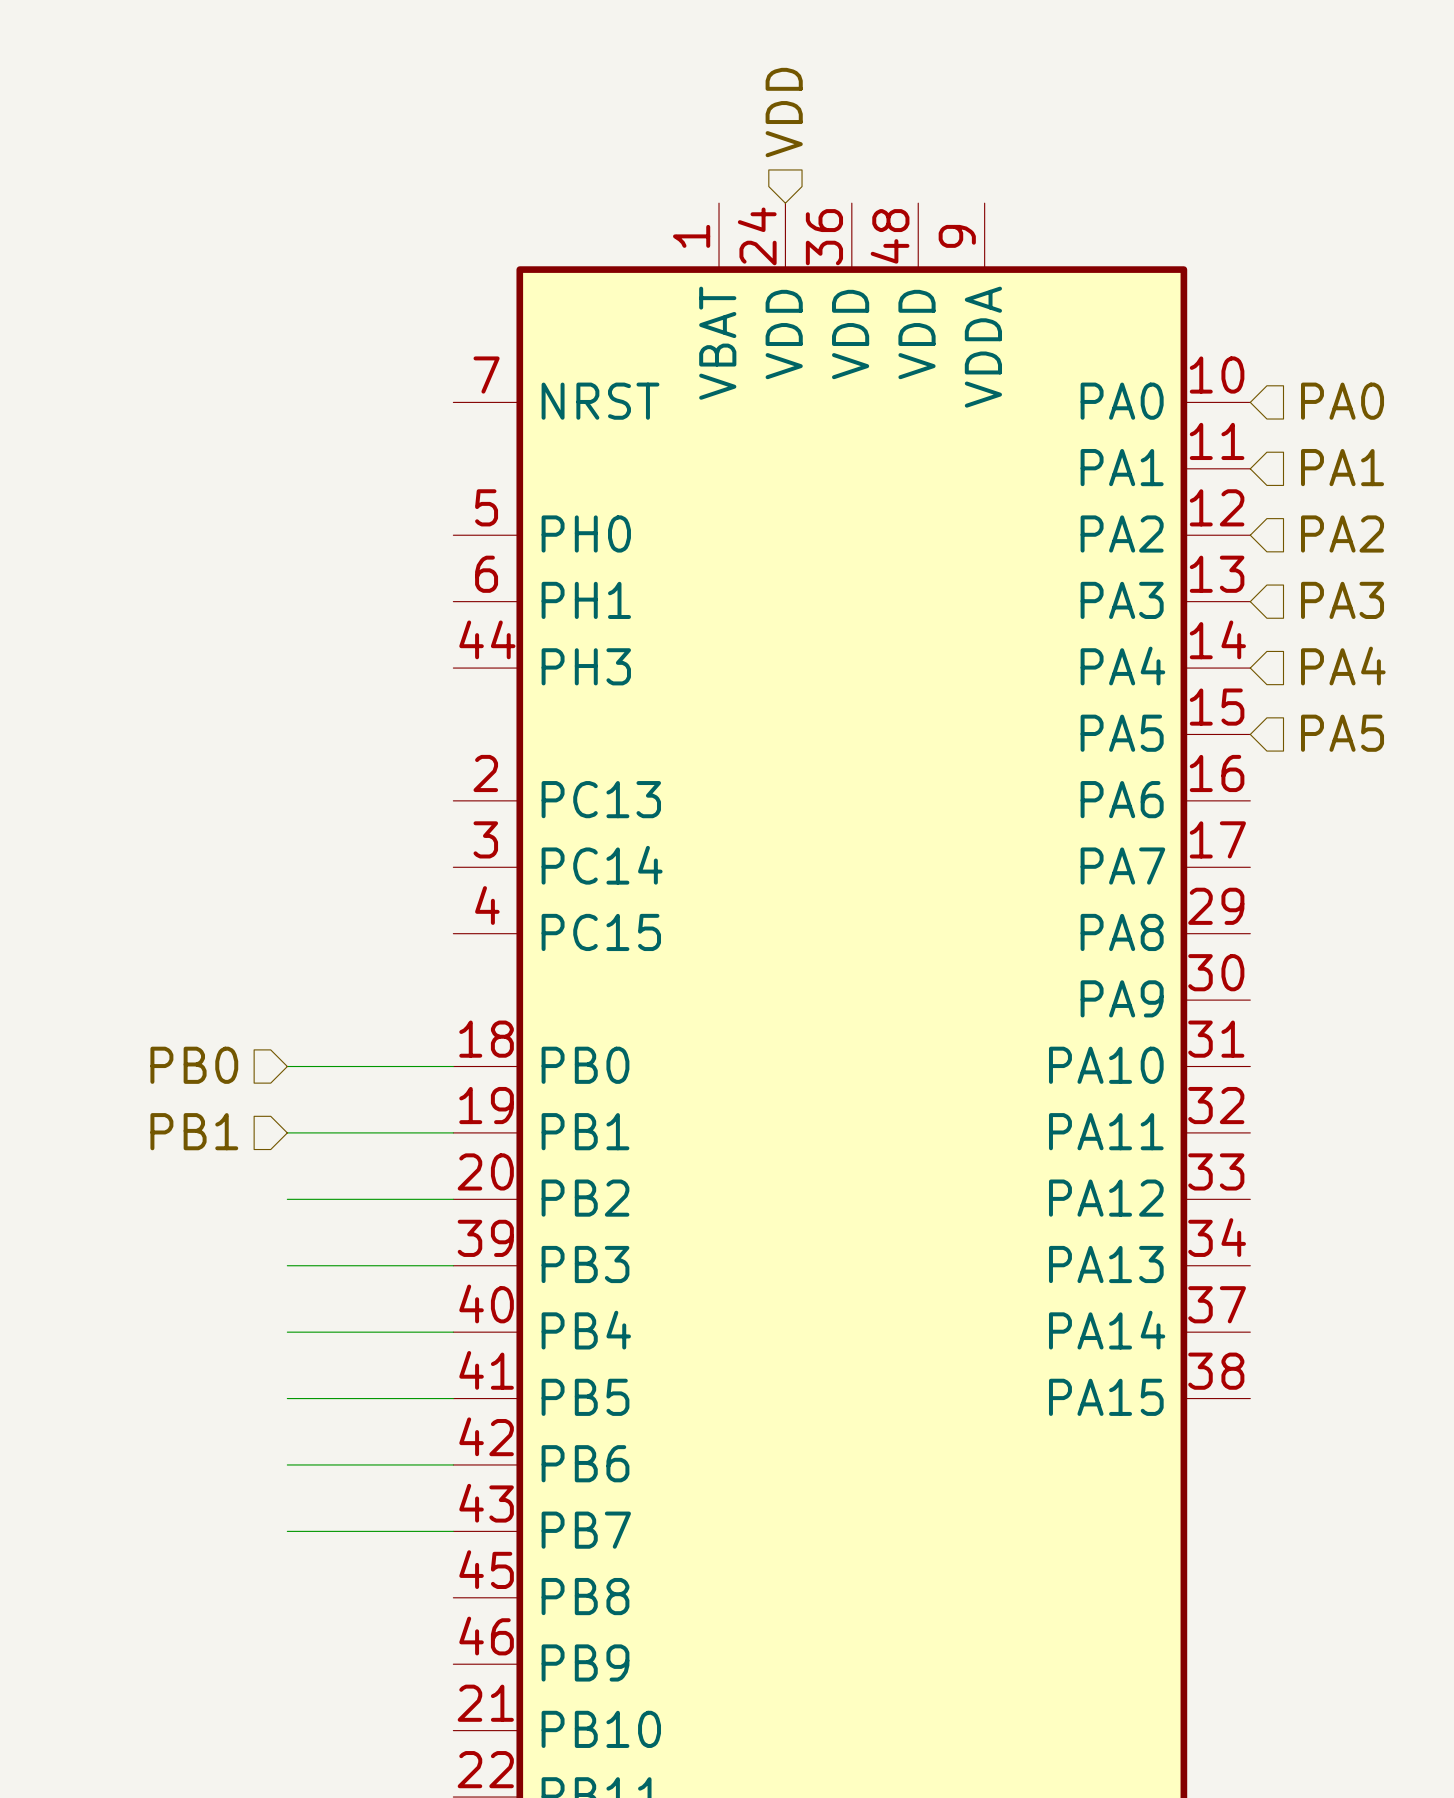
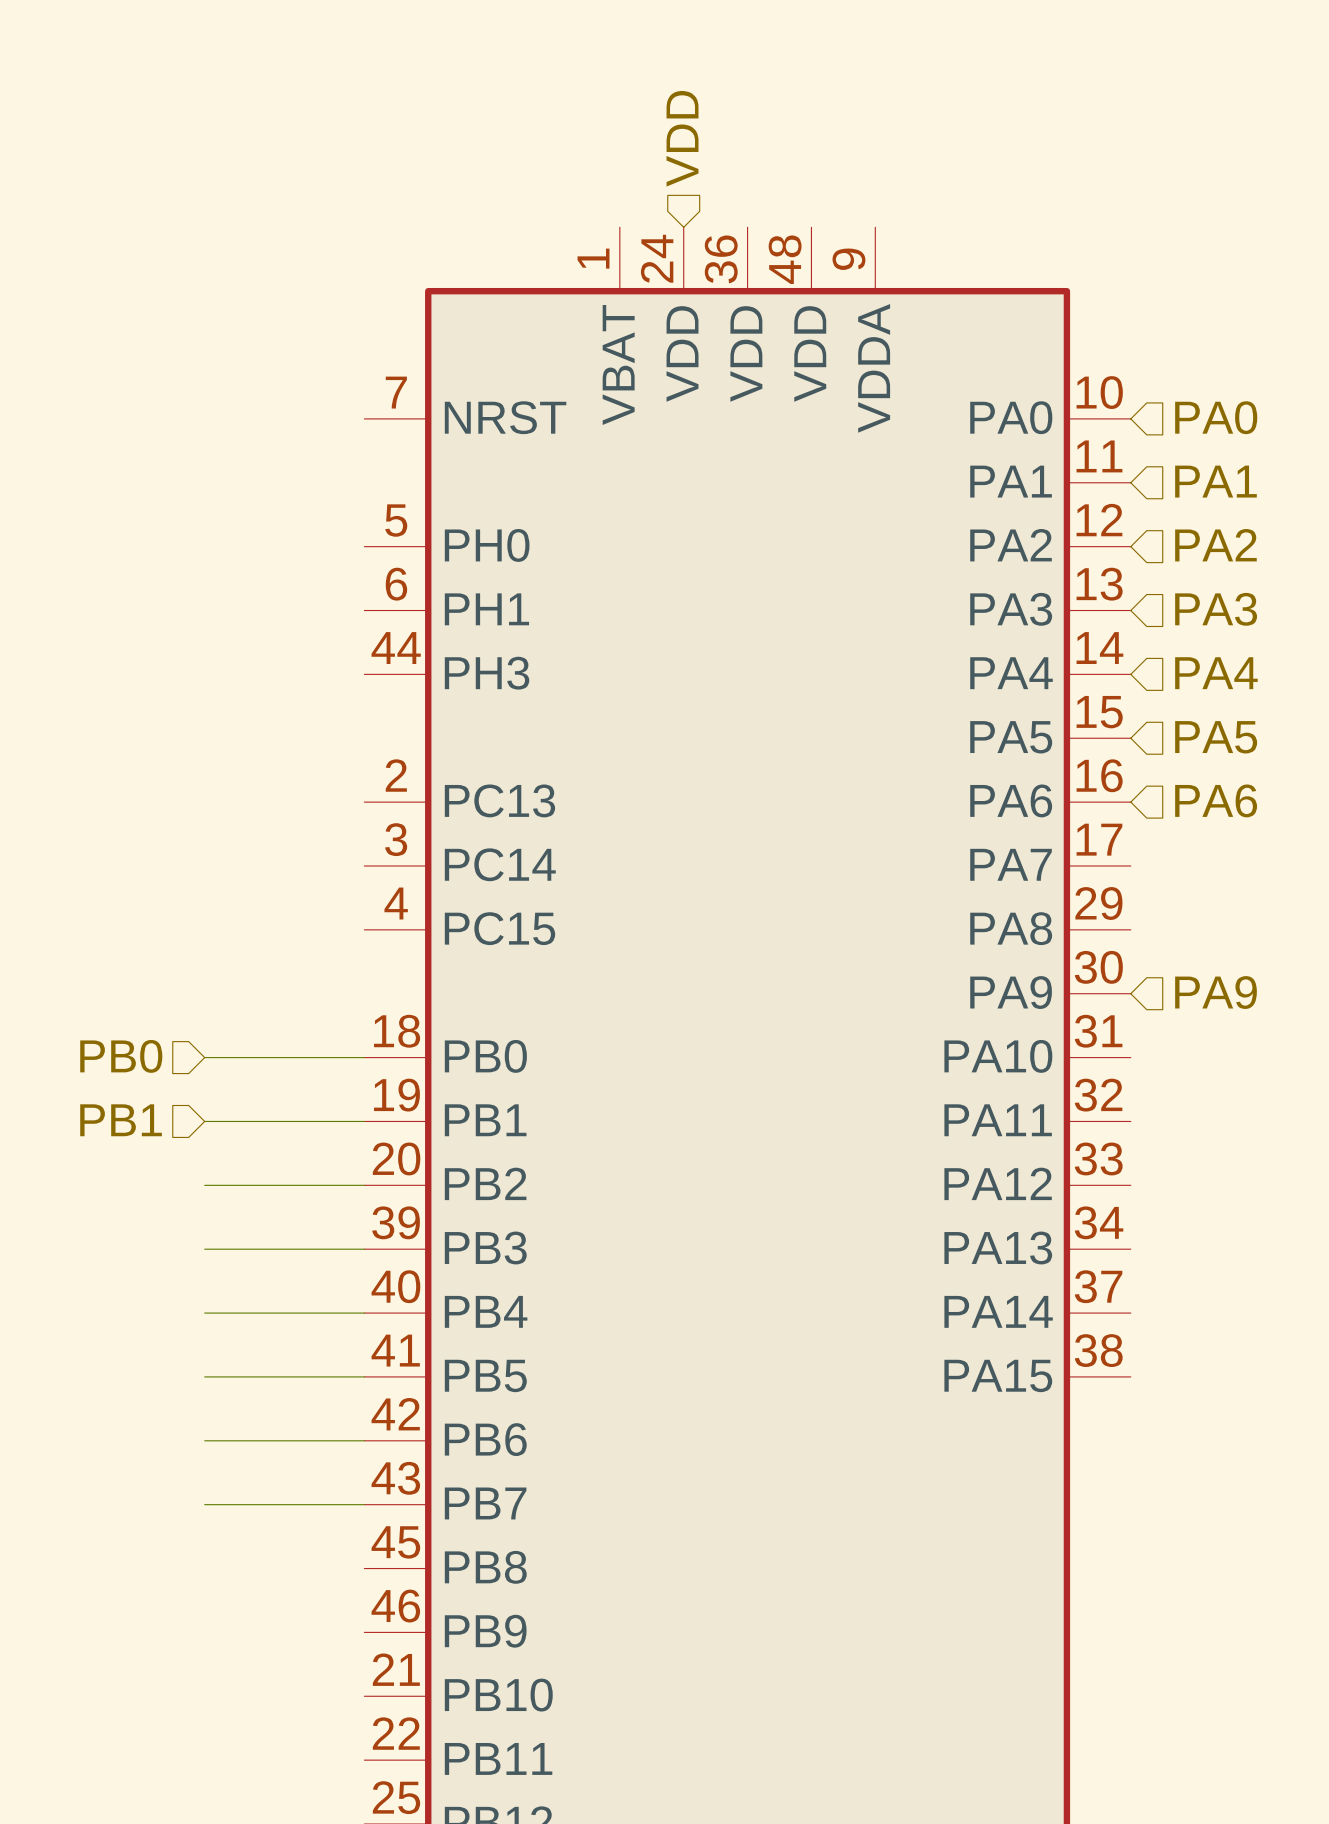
hierarchical label: none -> PA6 (1216, 800)
hierarchical label: none -> PA9 (1216, 992)

